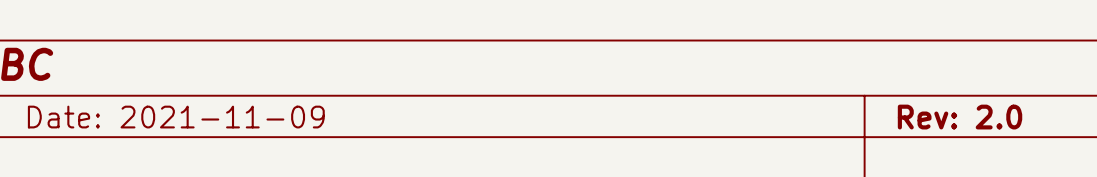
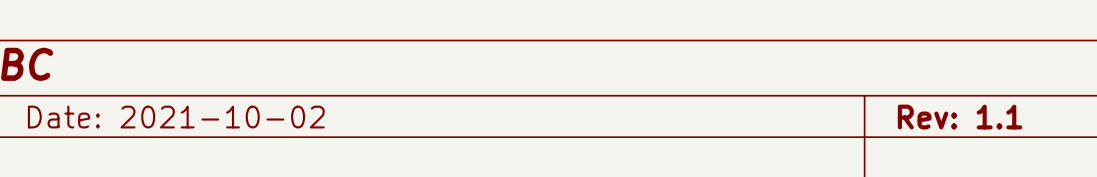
title block: Date: 2021-11-09 (176, 117) -> Date: 2021-10-02 (176, 117)
title block: Rev: 2.0 (960, 117) -> Rev: 1.1 (960, 117)

